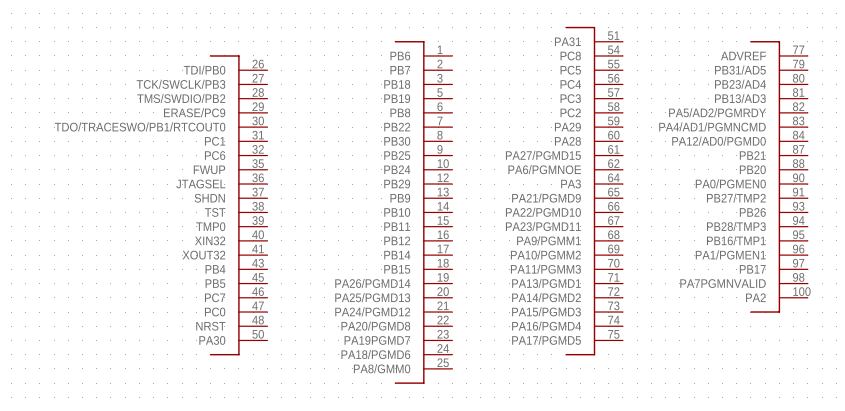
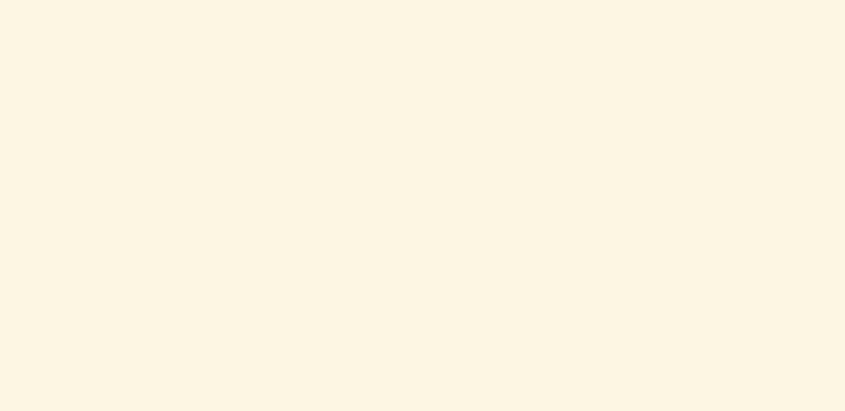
part: (779, 176) -> none
part: (594, 191) -> none
part: (238, 205) -> none
part: (423, 212) -> none

